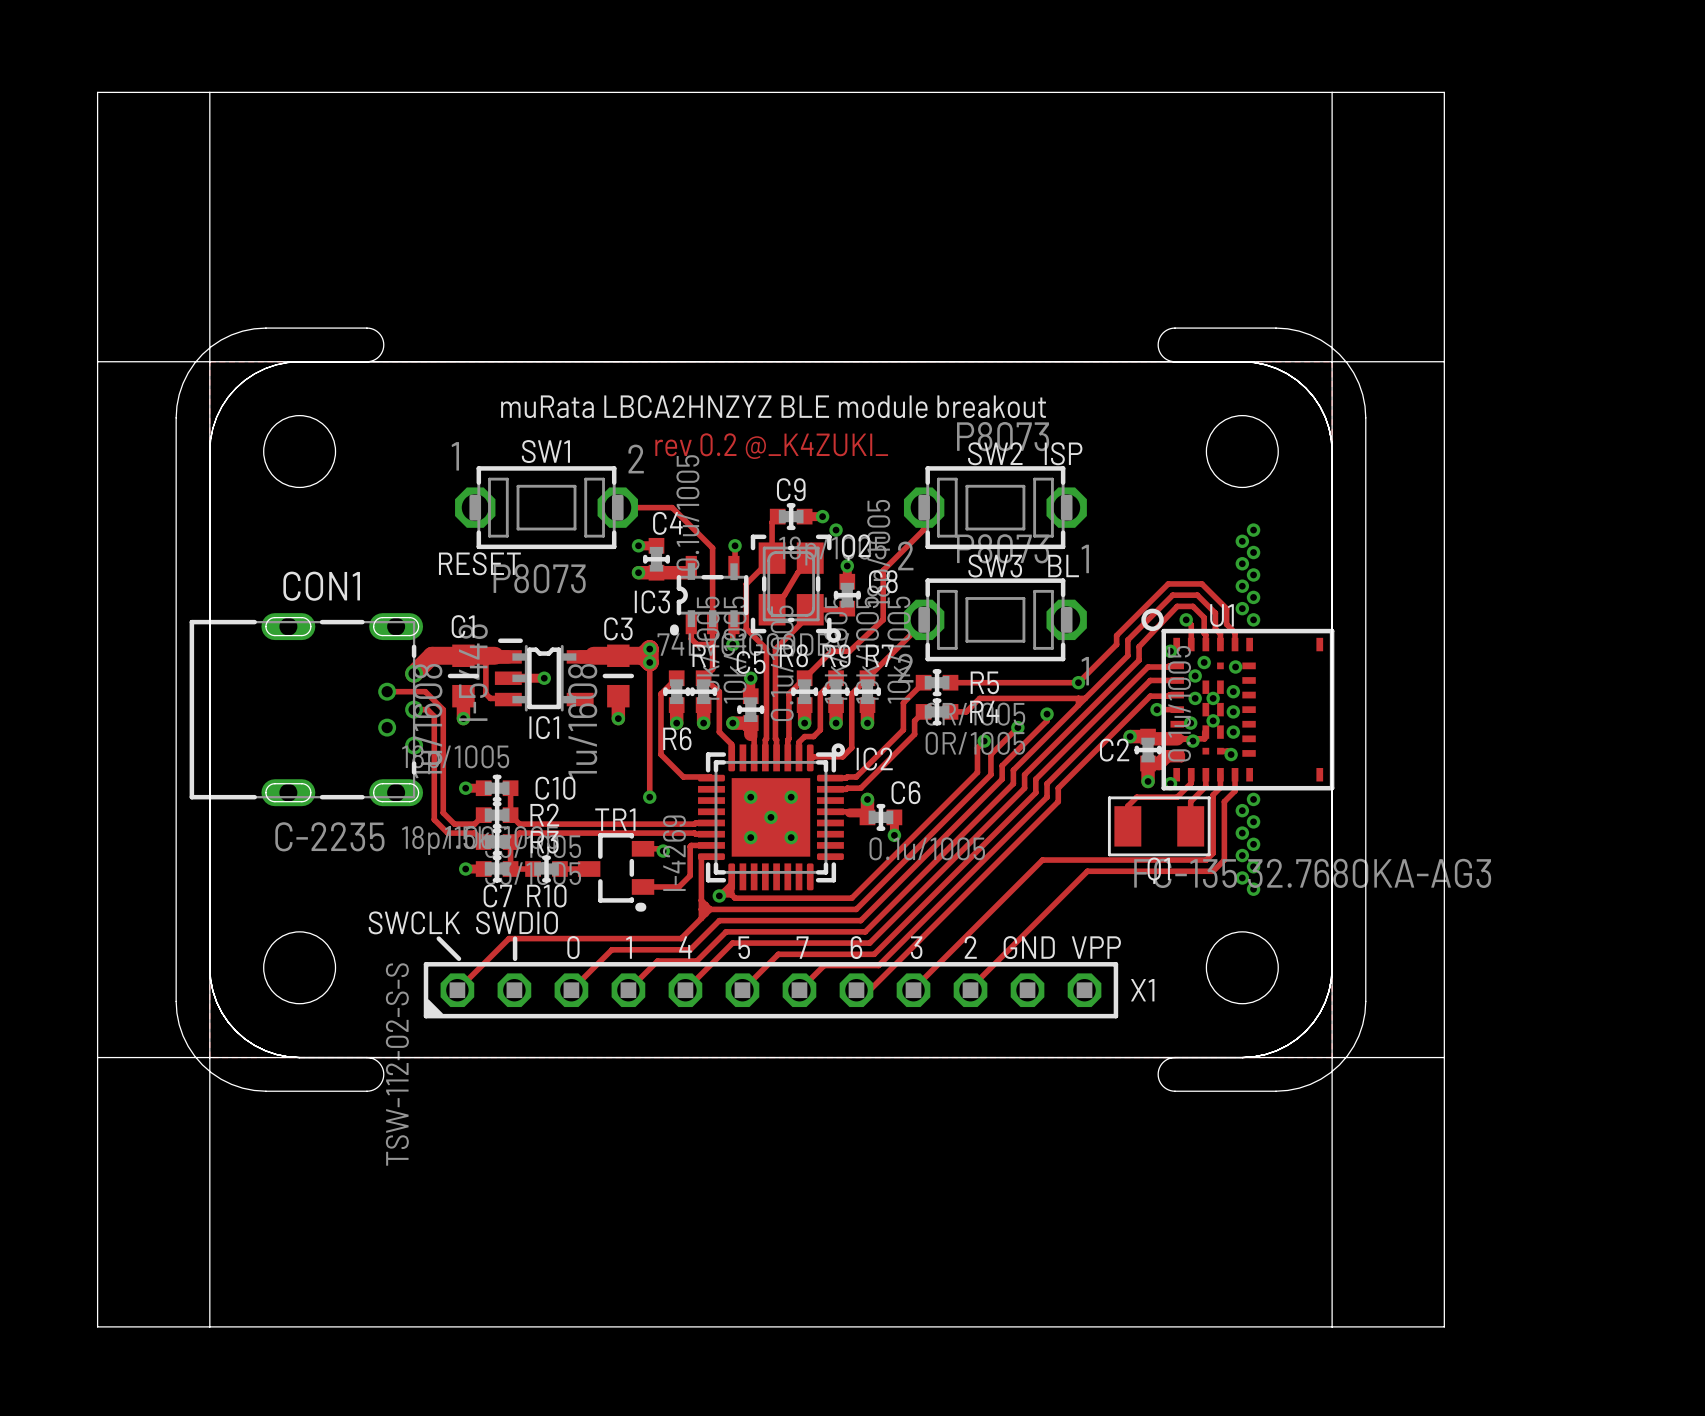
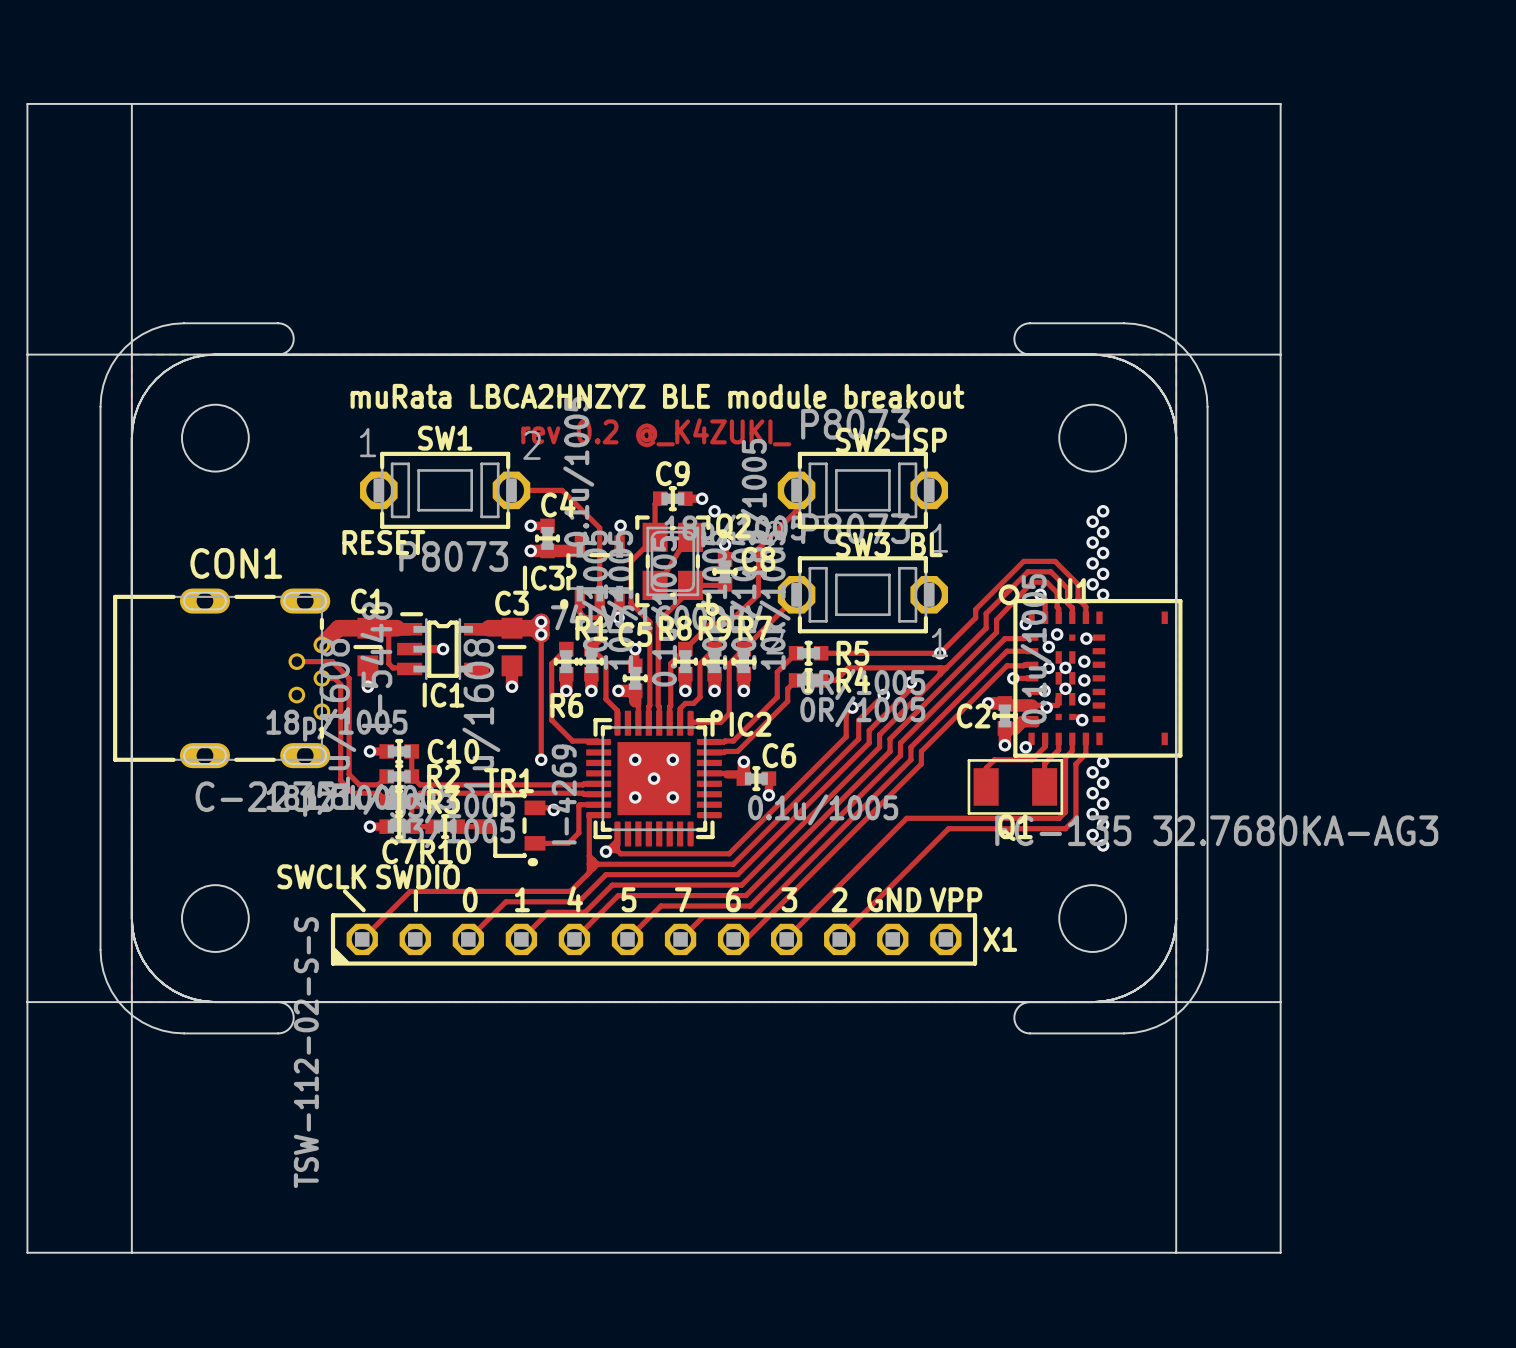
U1 footprint: [1141, 608, 1335, 791] -> [998, 584, 1183, 758]

